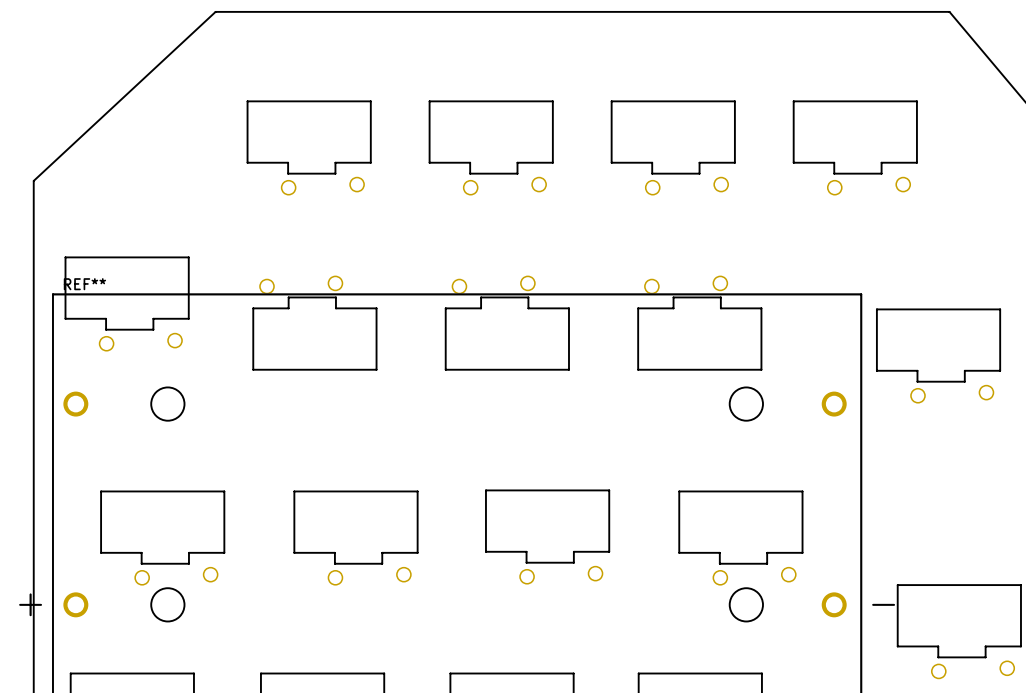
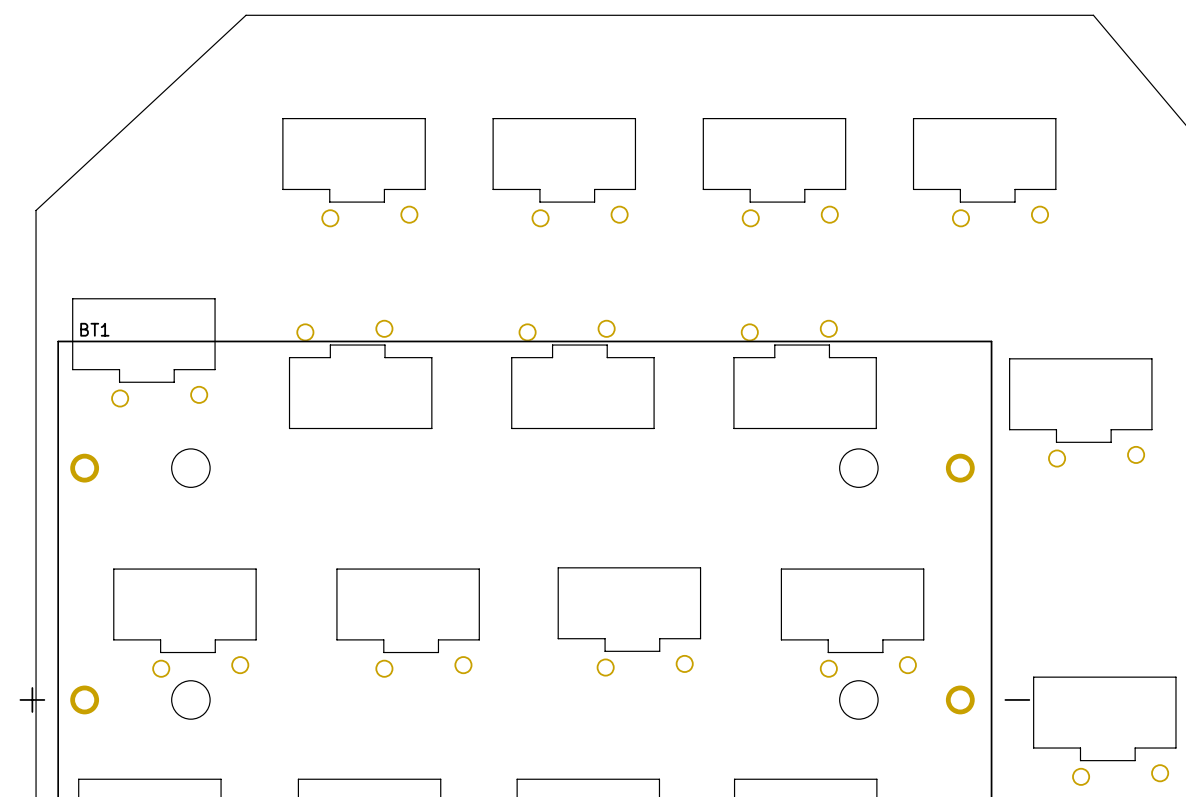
REF** name: REF** (84, 284) -> BT1 (94, 329)

